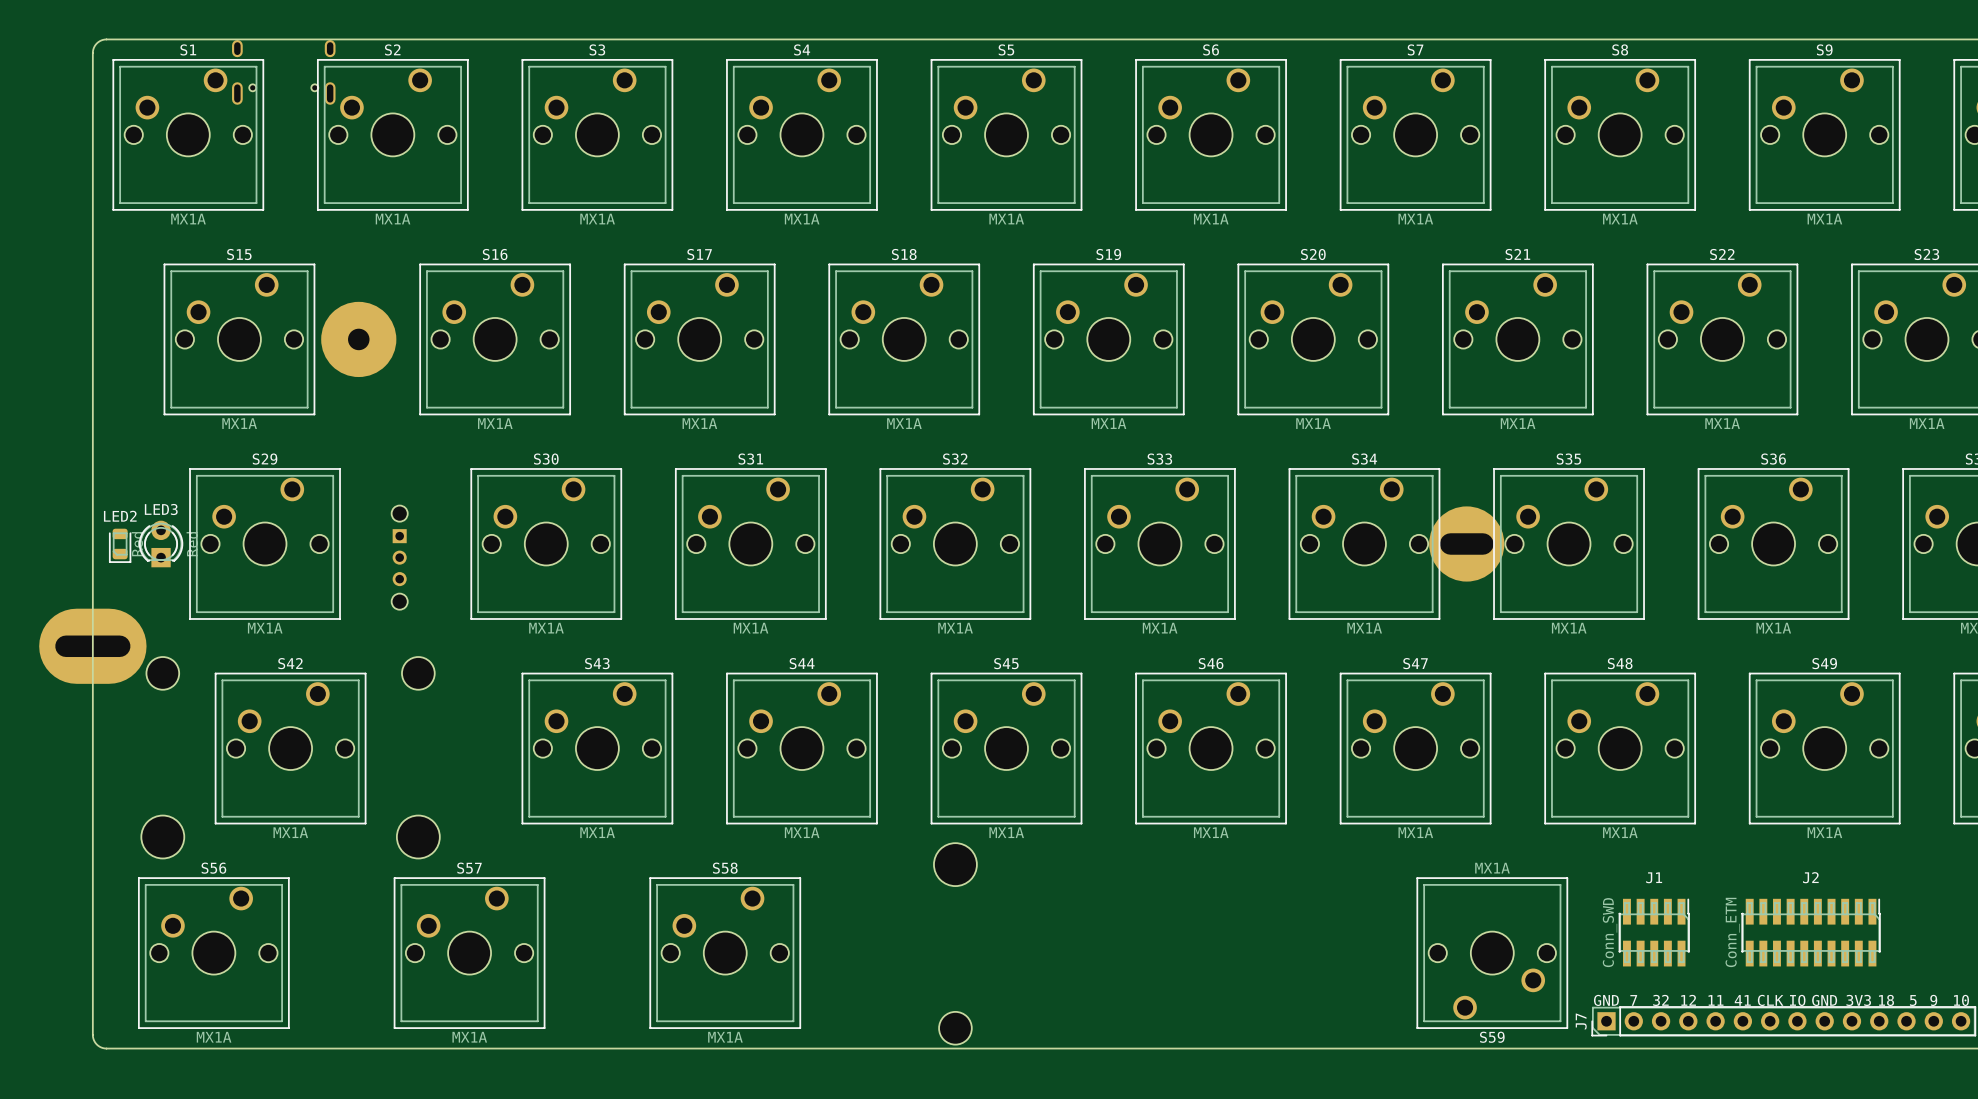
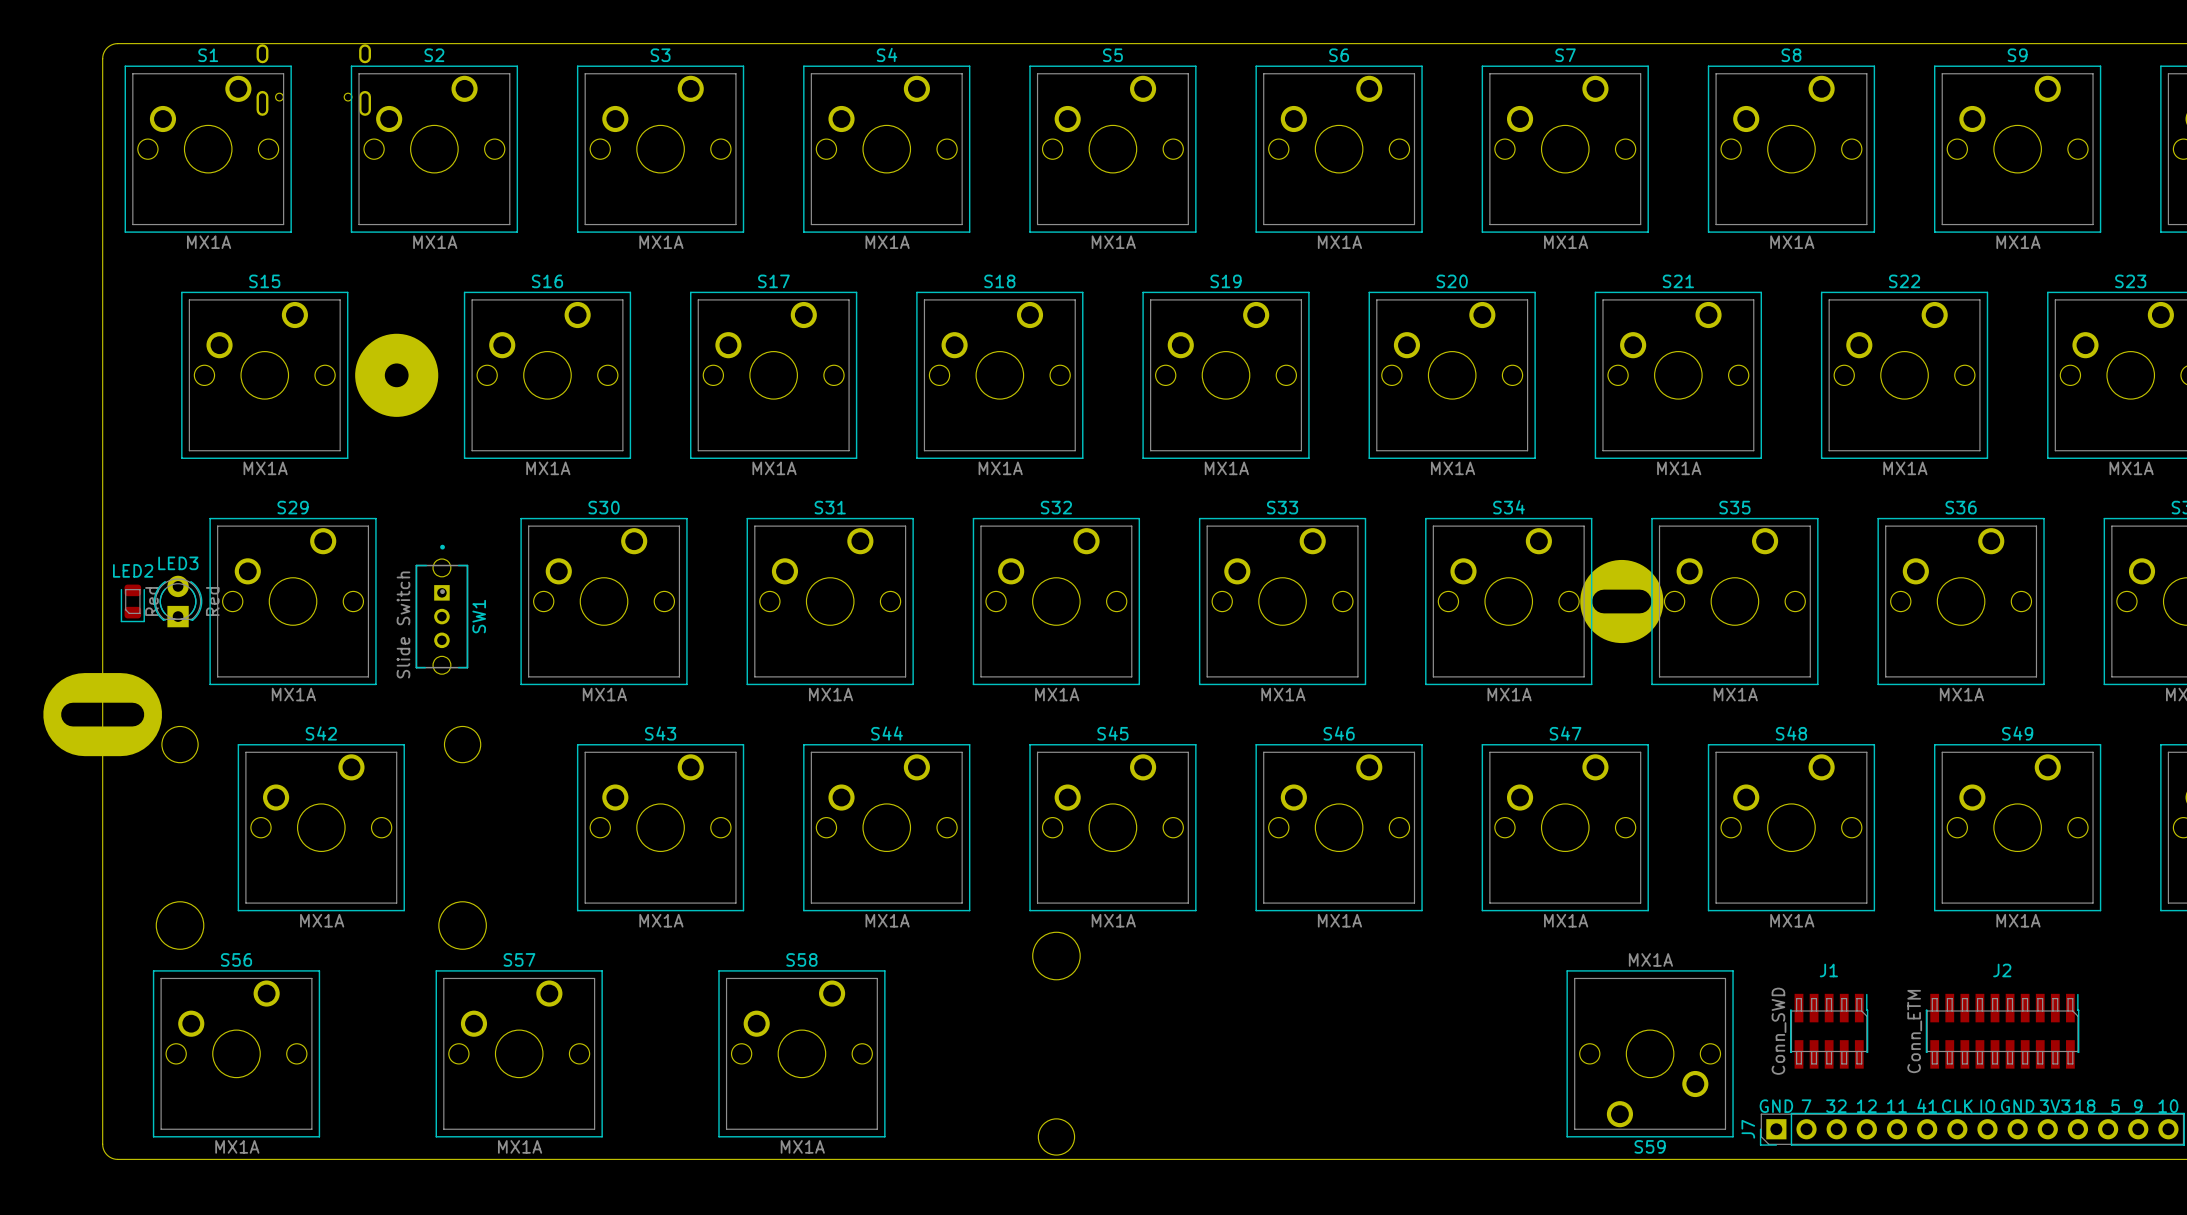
SW1 side: bottom (399, 557) -> top (441, 609)

